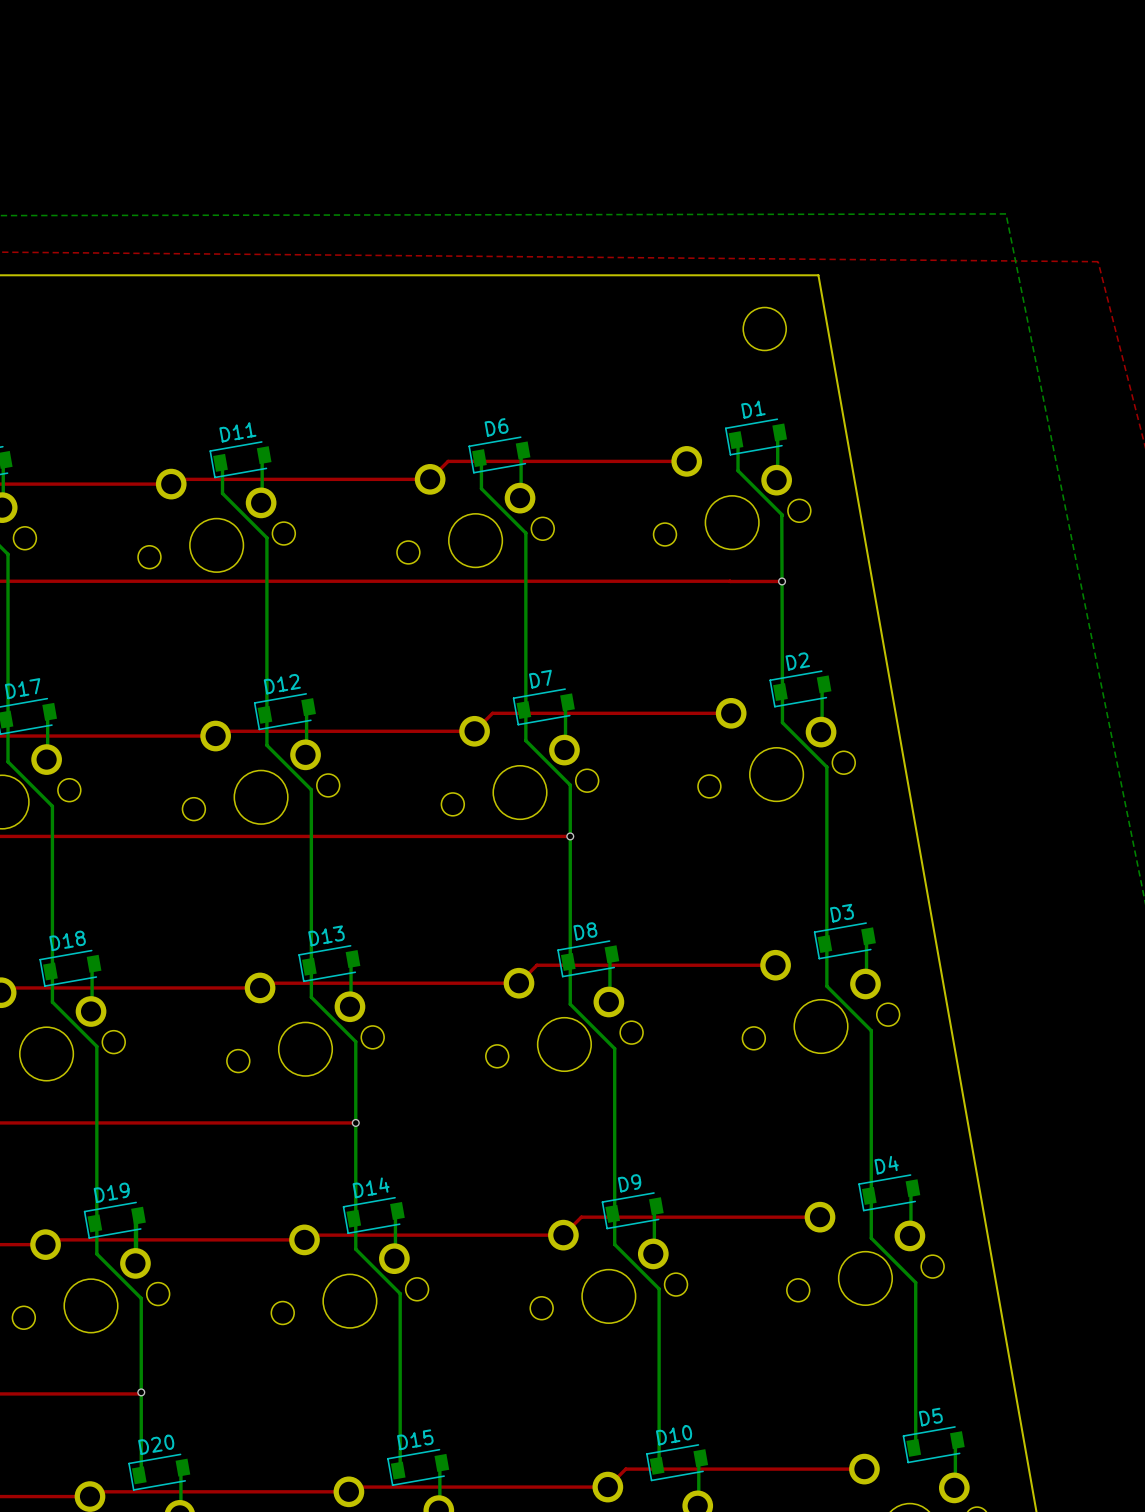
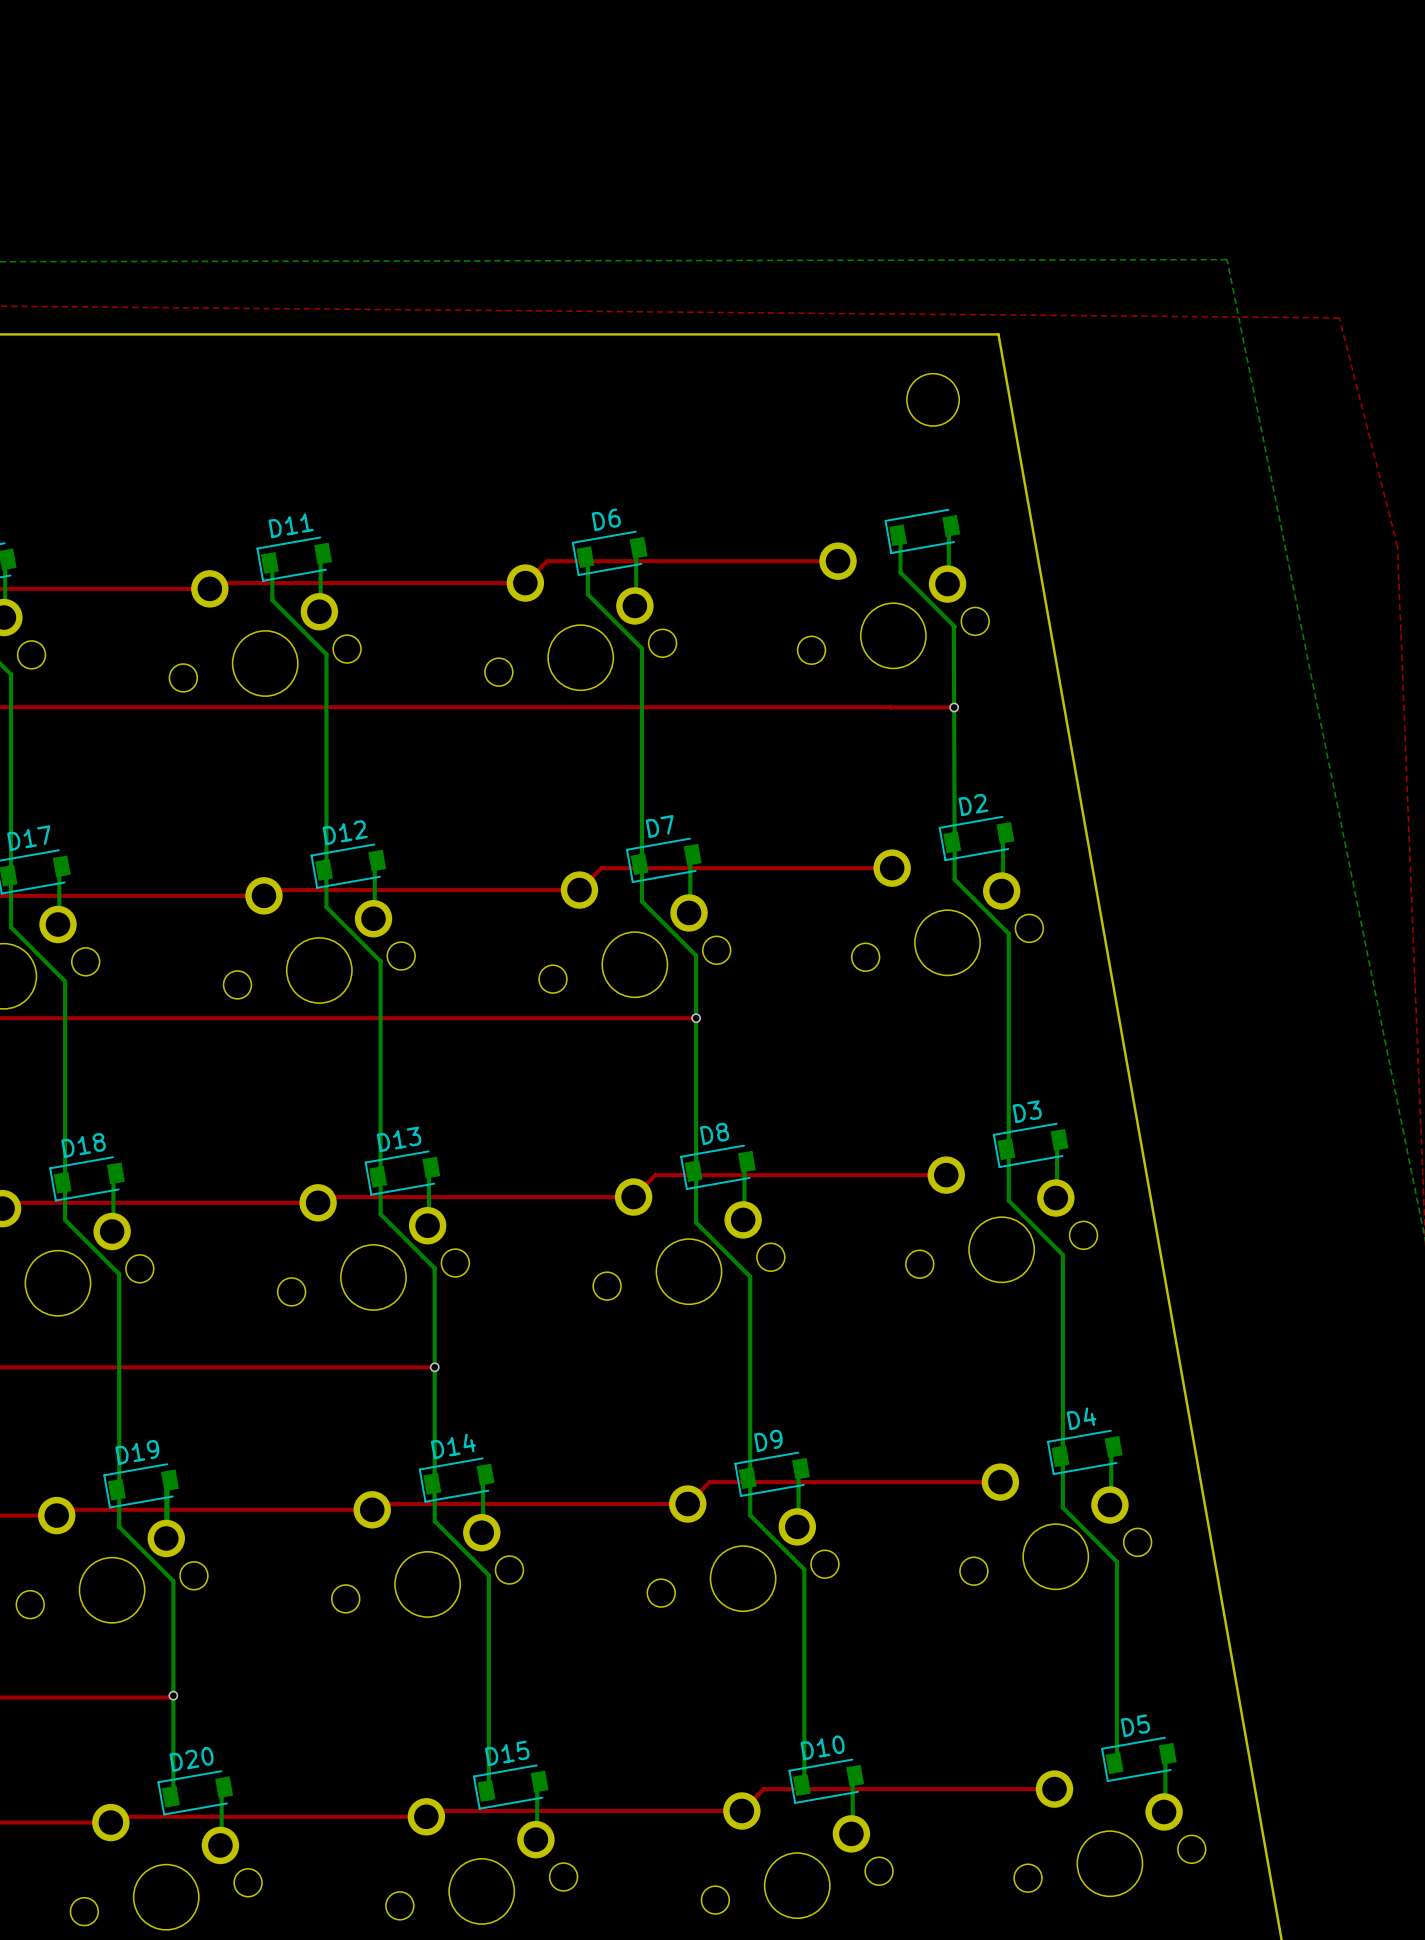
D1 name: D1 (753, 409) -> none

